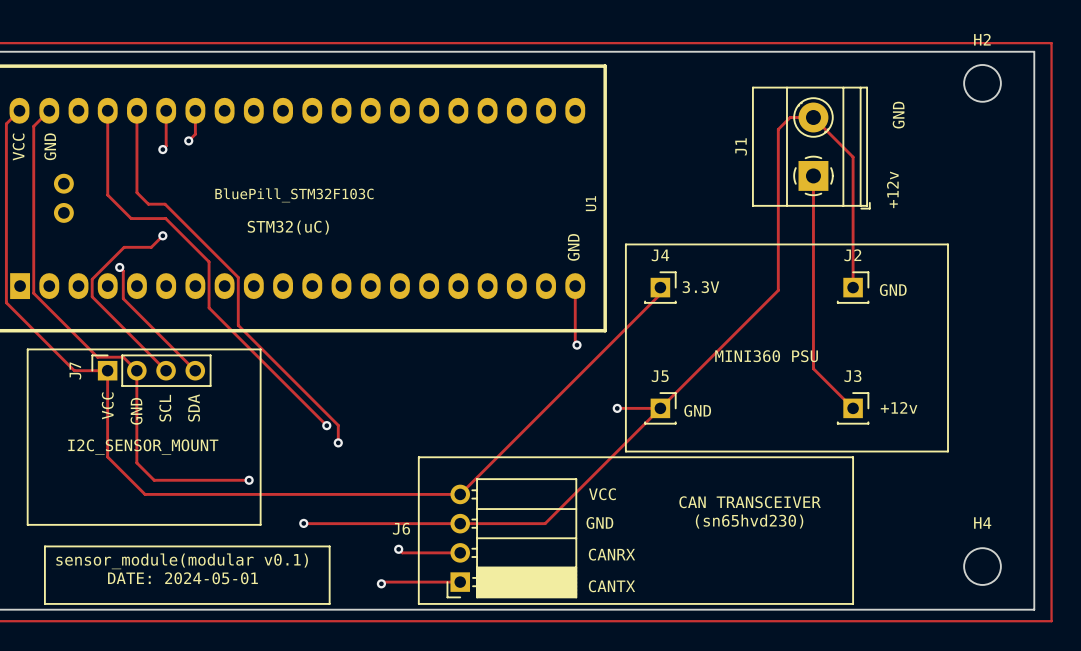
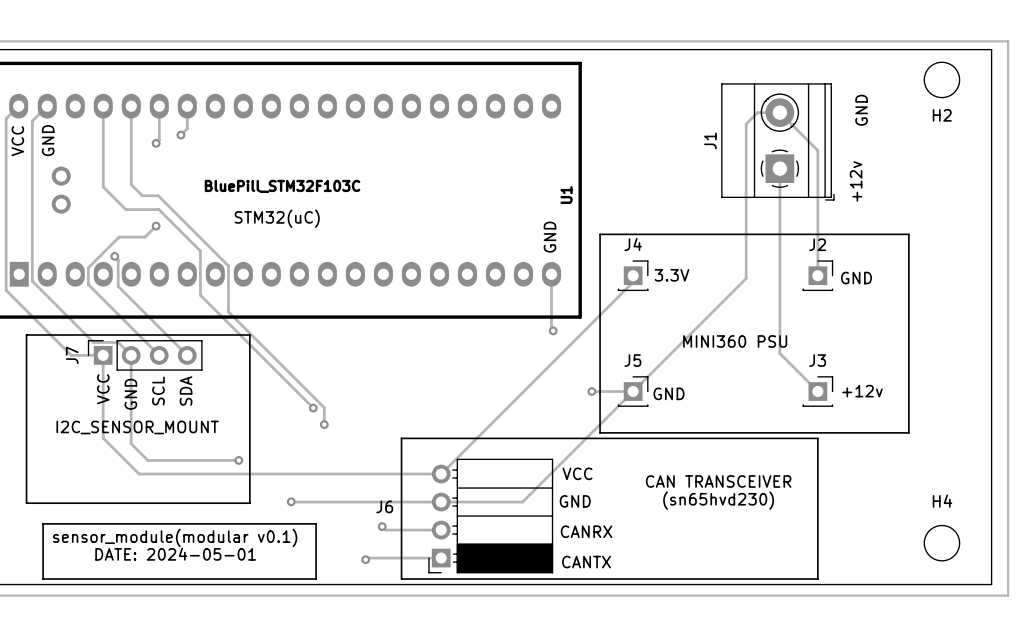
H2 name position: H2 (982, 39) -> H2 (942, 115)

